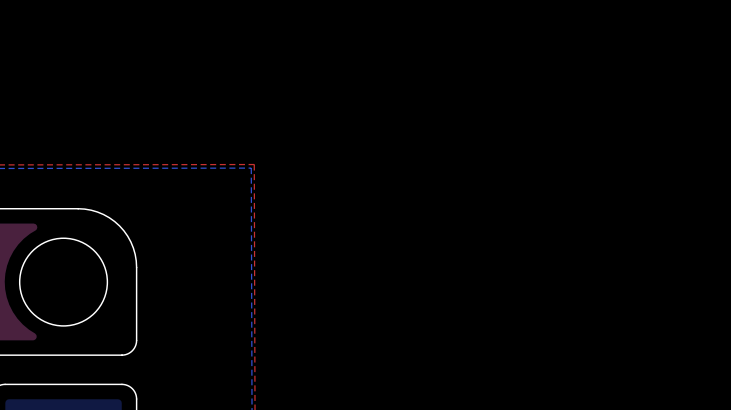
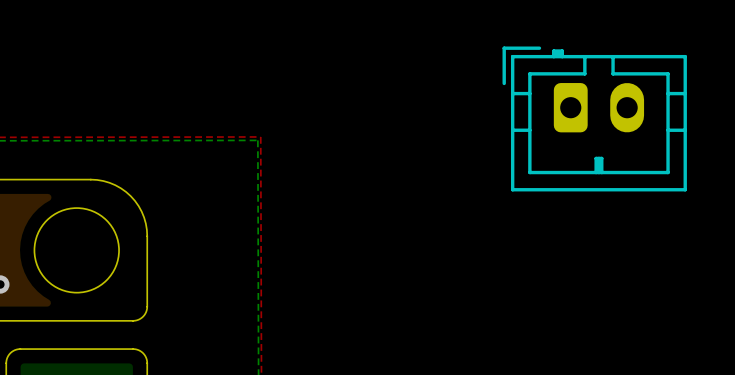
part: none -> (594, 118)

